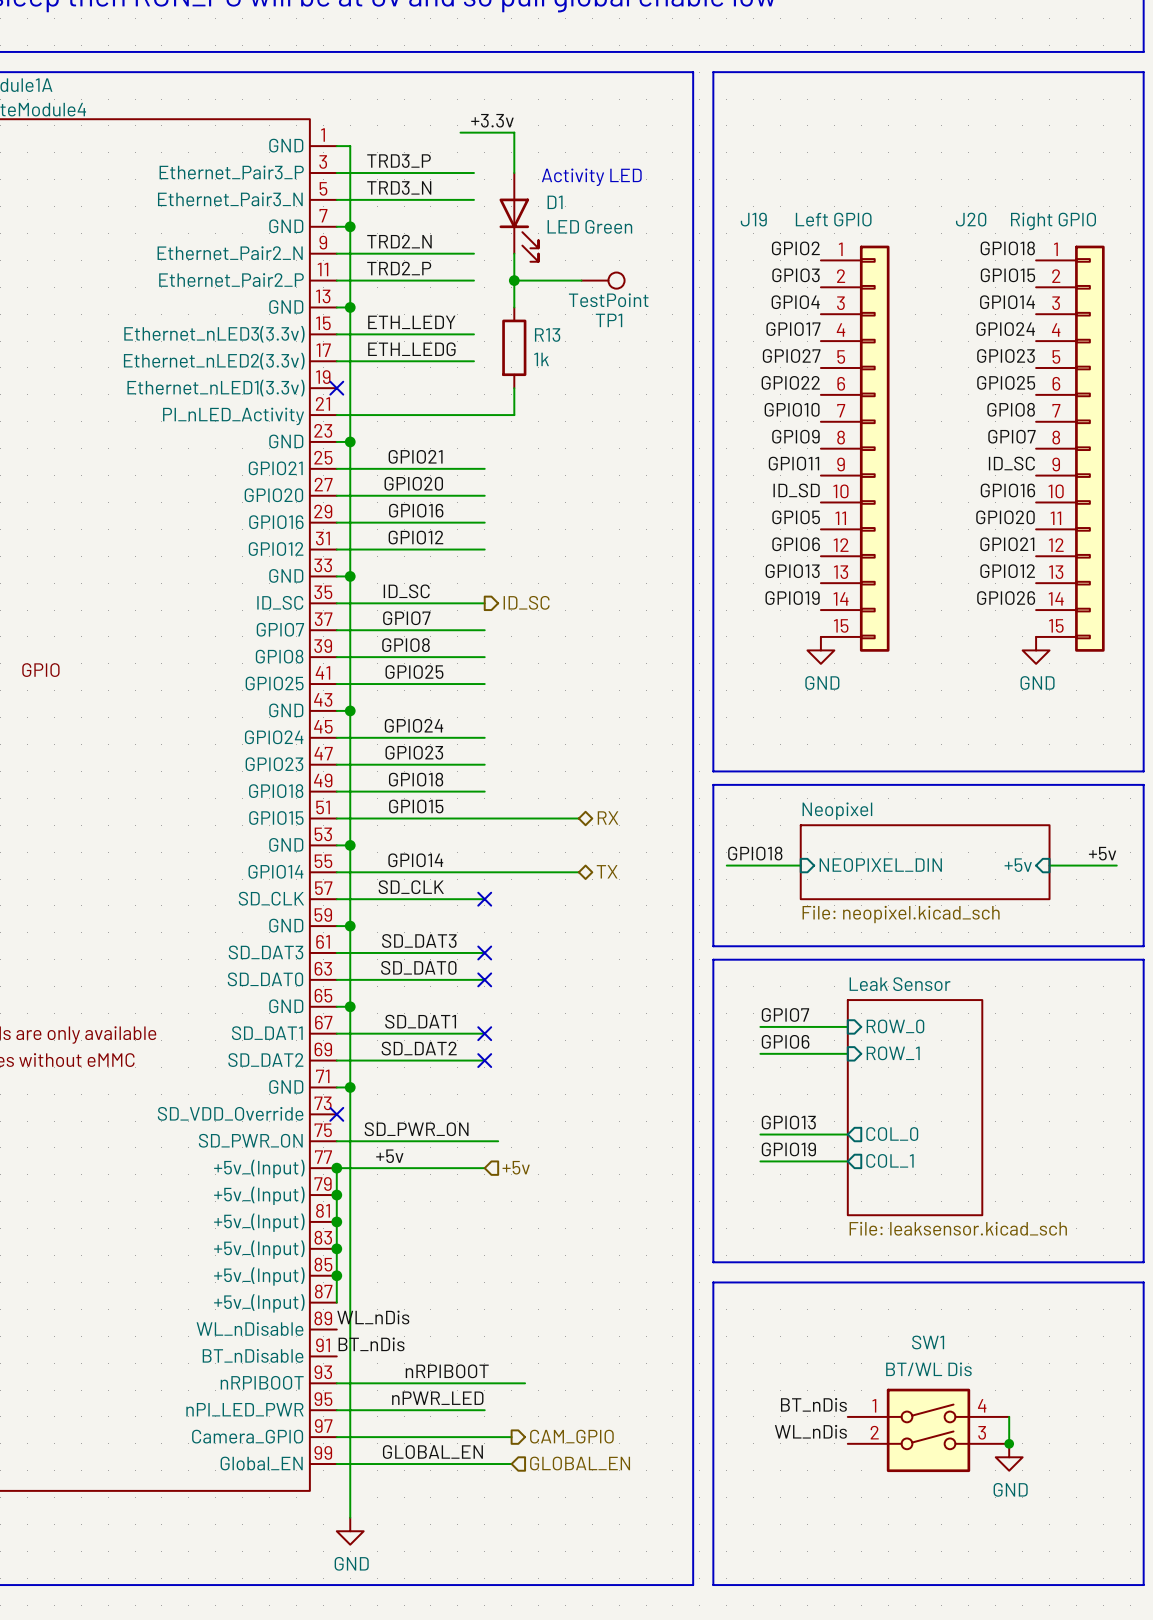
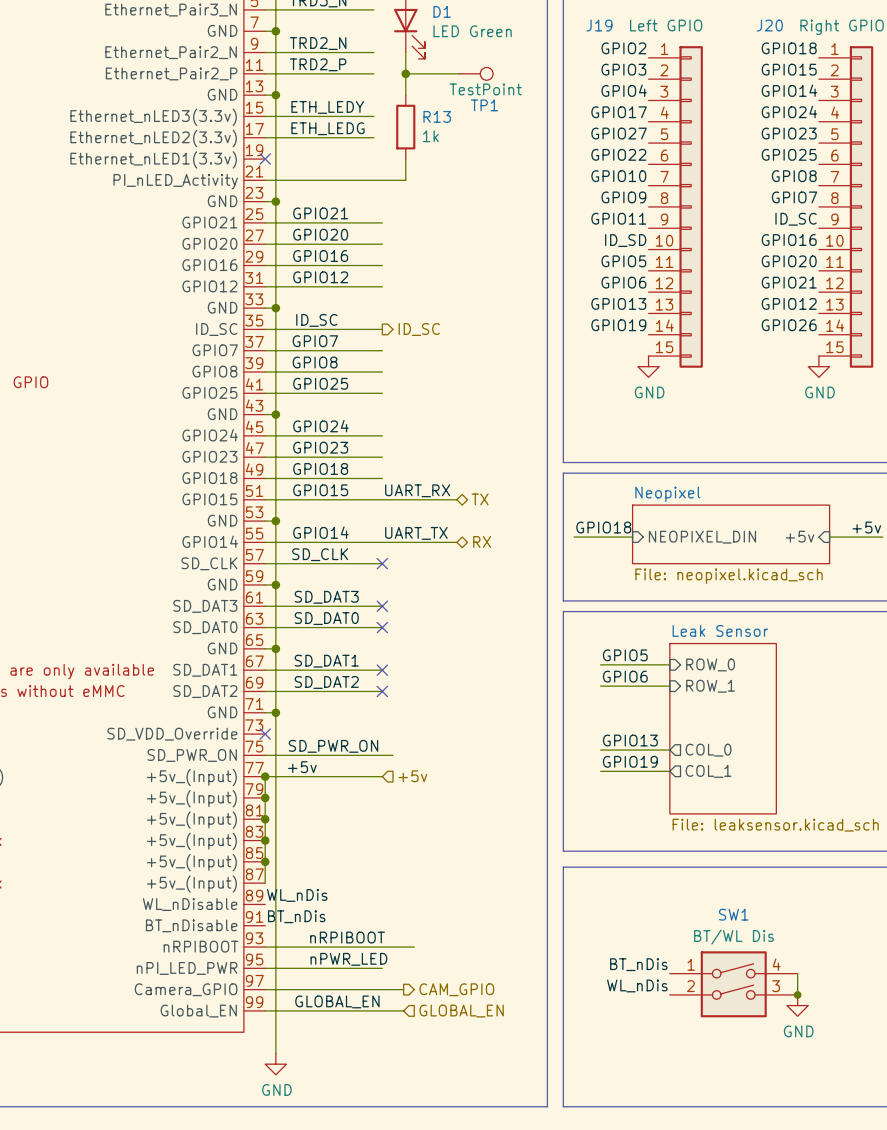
label: none -> UART_RX (417, 490)
hierarchical label: RX (608, 818) -> TX (480, 499)
label: none -> UART_TX (416, 533)
hierarchical label: TX (607, 871) -> RX (482, 541)
label: GPIO7 (785, 1014) -> GPIO5 (625, 655)

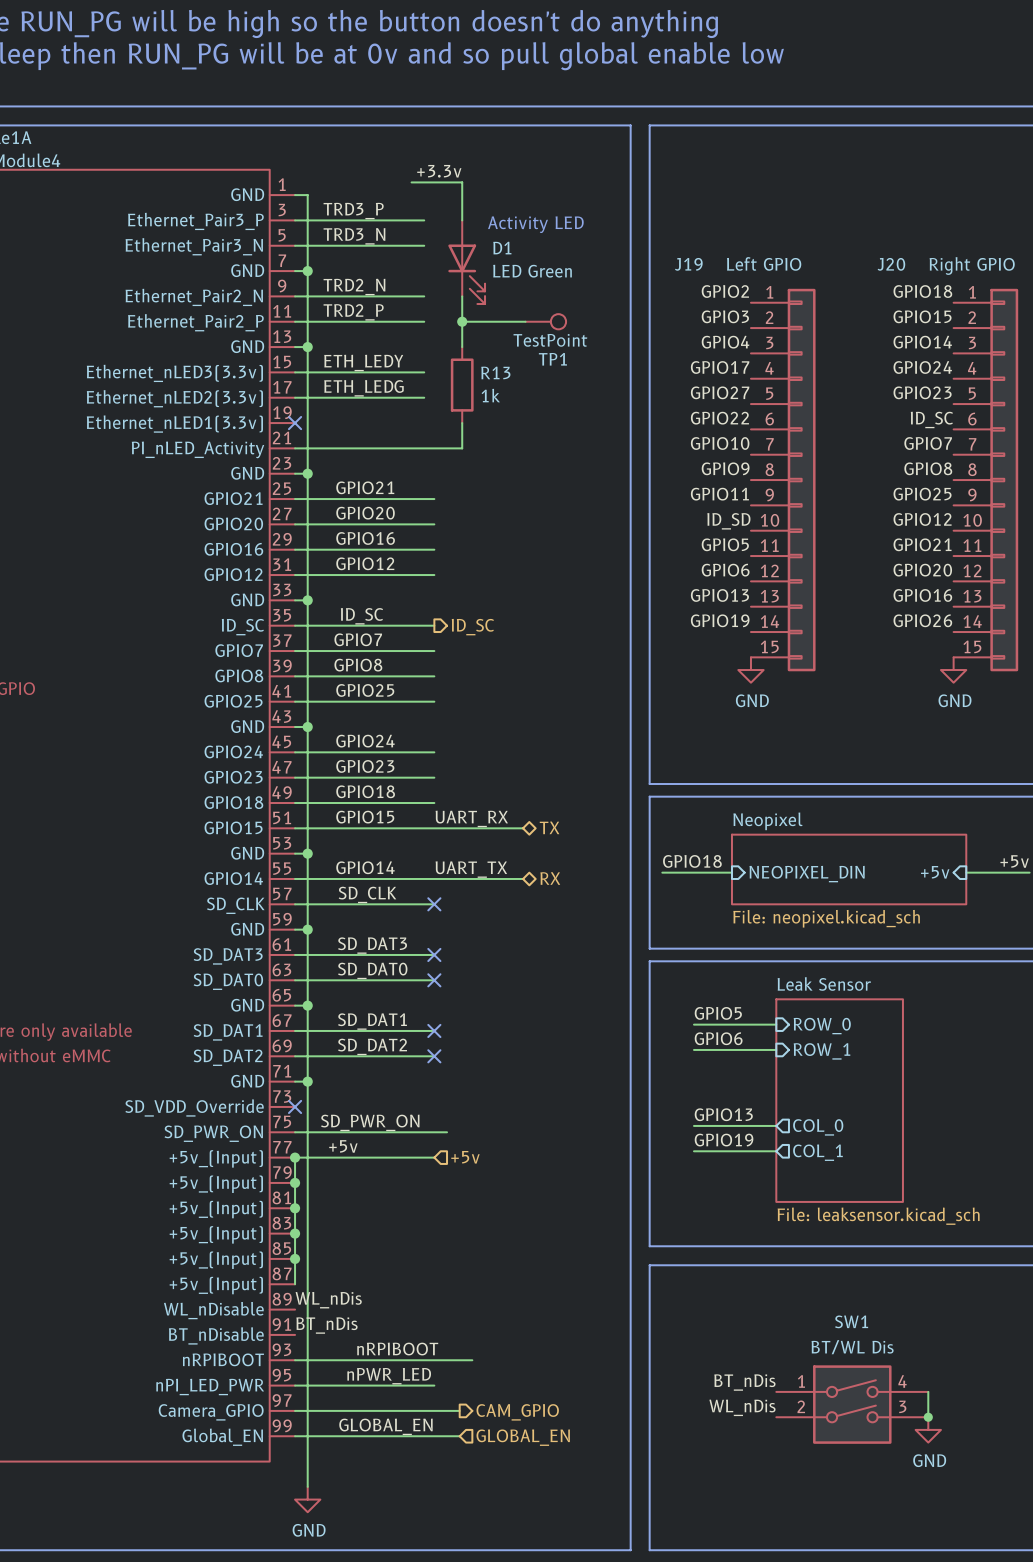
label: GPIO25 (789, 154) -> ID_SC (931, 419)
label: GPIO8 (794, 176) -> GPIO7 (928, 443)
label: GPIO7 (794, 197) -> GPIO8 (928, 468)
label: ID_SC (796, 219) -> GPIO25 (922, 494)
label: GPIO16 (789, 240) -> GPIO12 (922, 519)
label: GPIO20 (789, 261) -> GPIO21 (922, 544)
label: GPIO21 (789, 282) -> GPIO20 (922, 570)
label: GPIO12 (789, 303) -> GPIO16 (922, 595)

